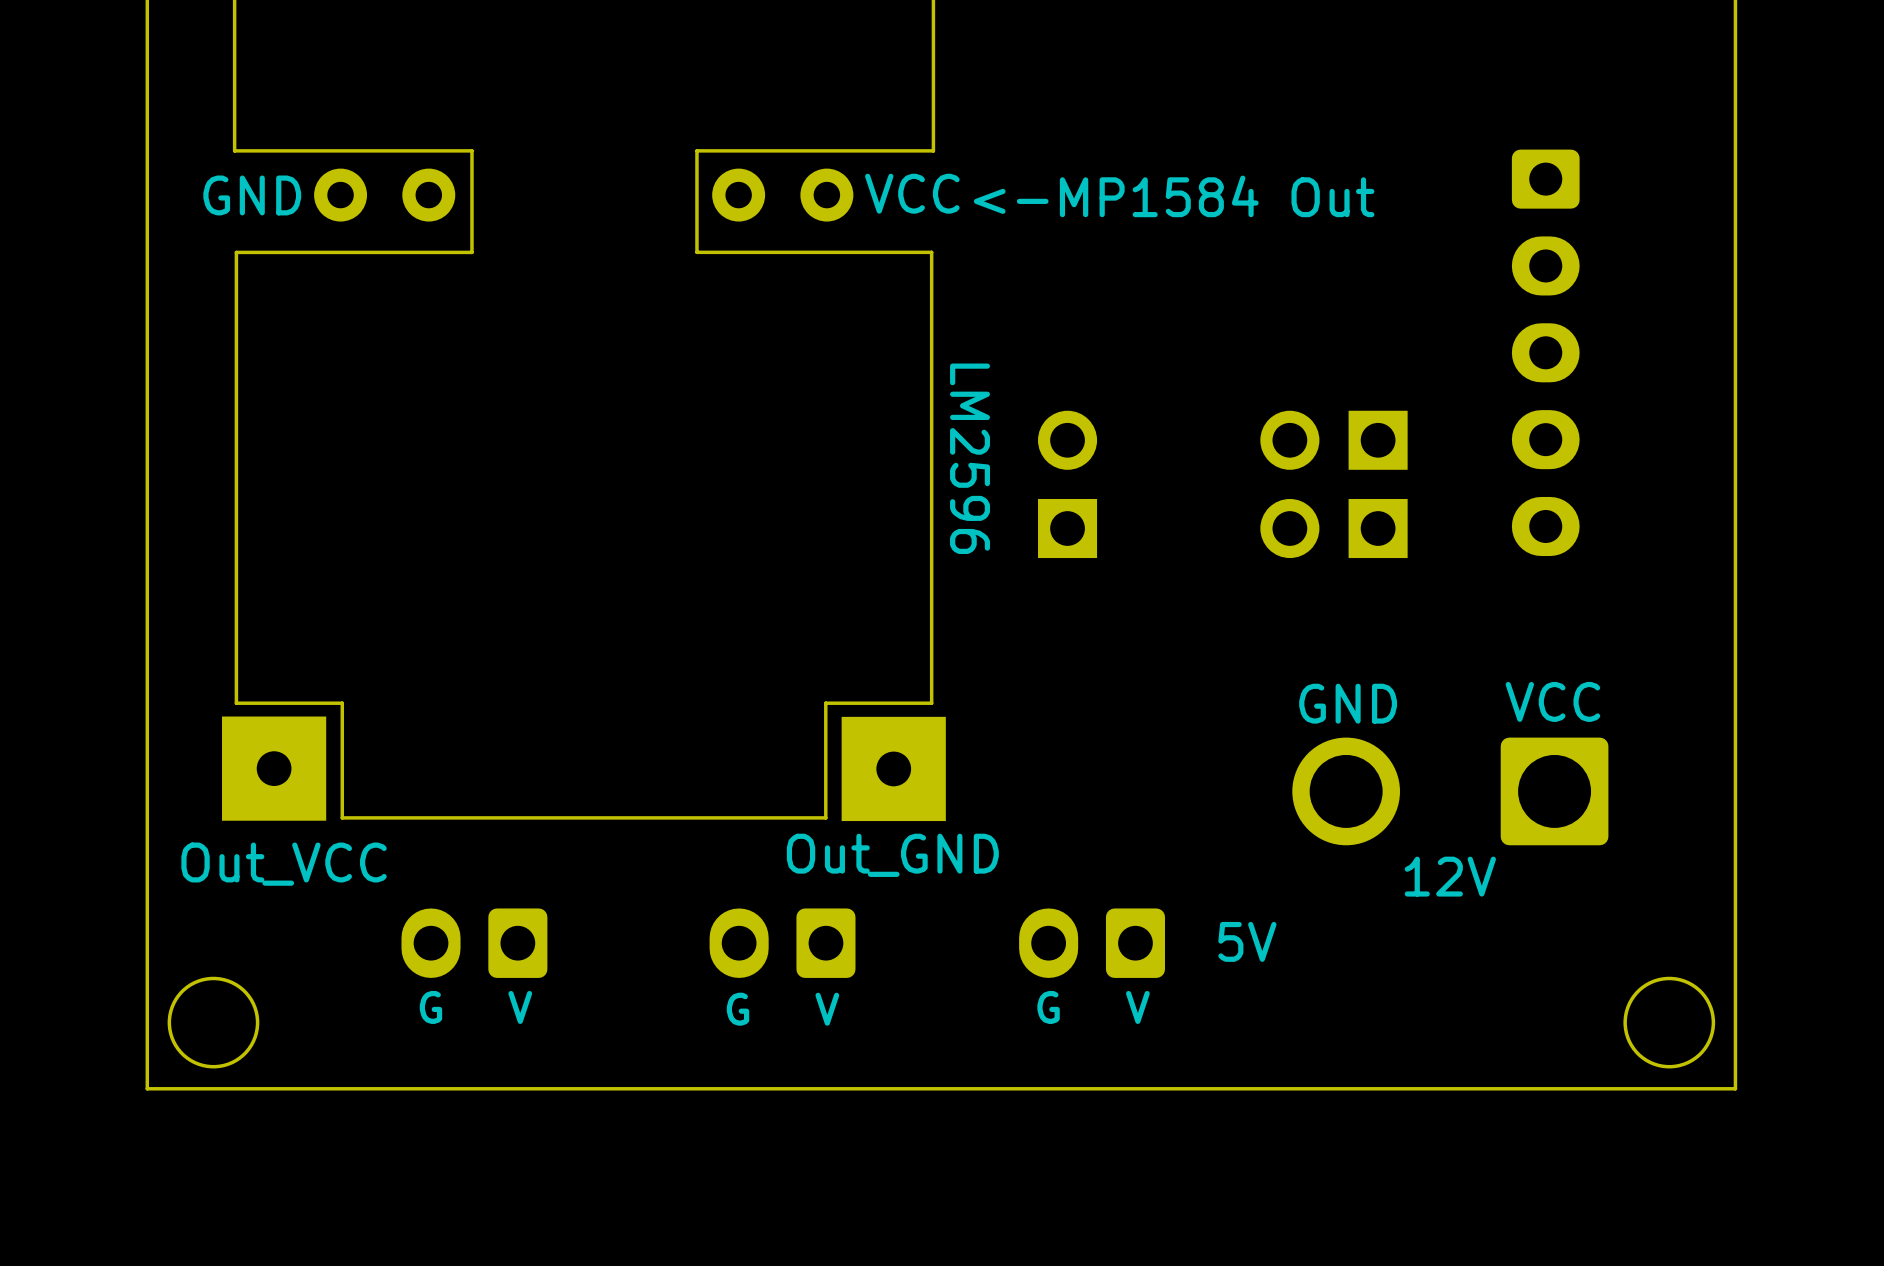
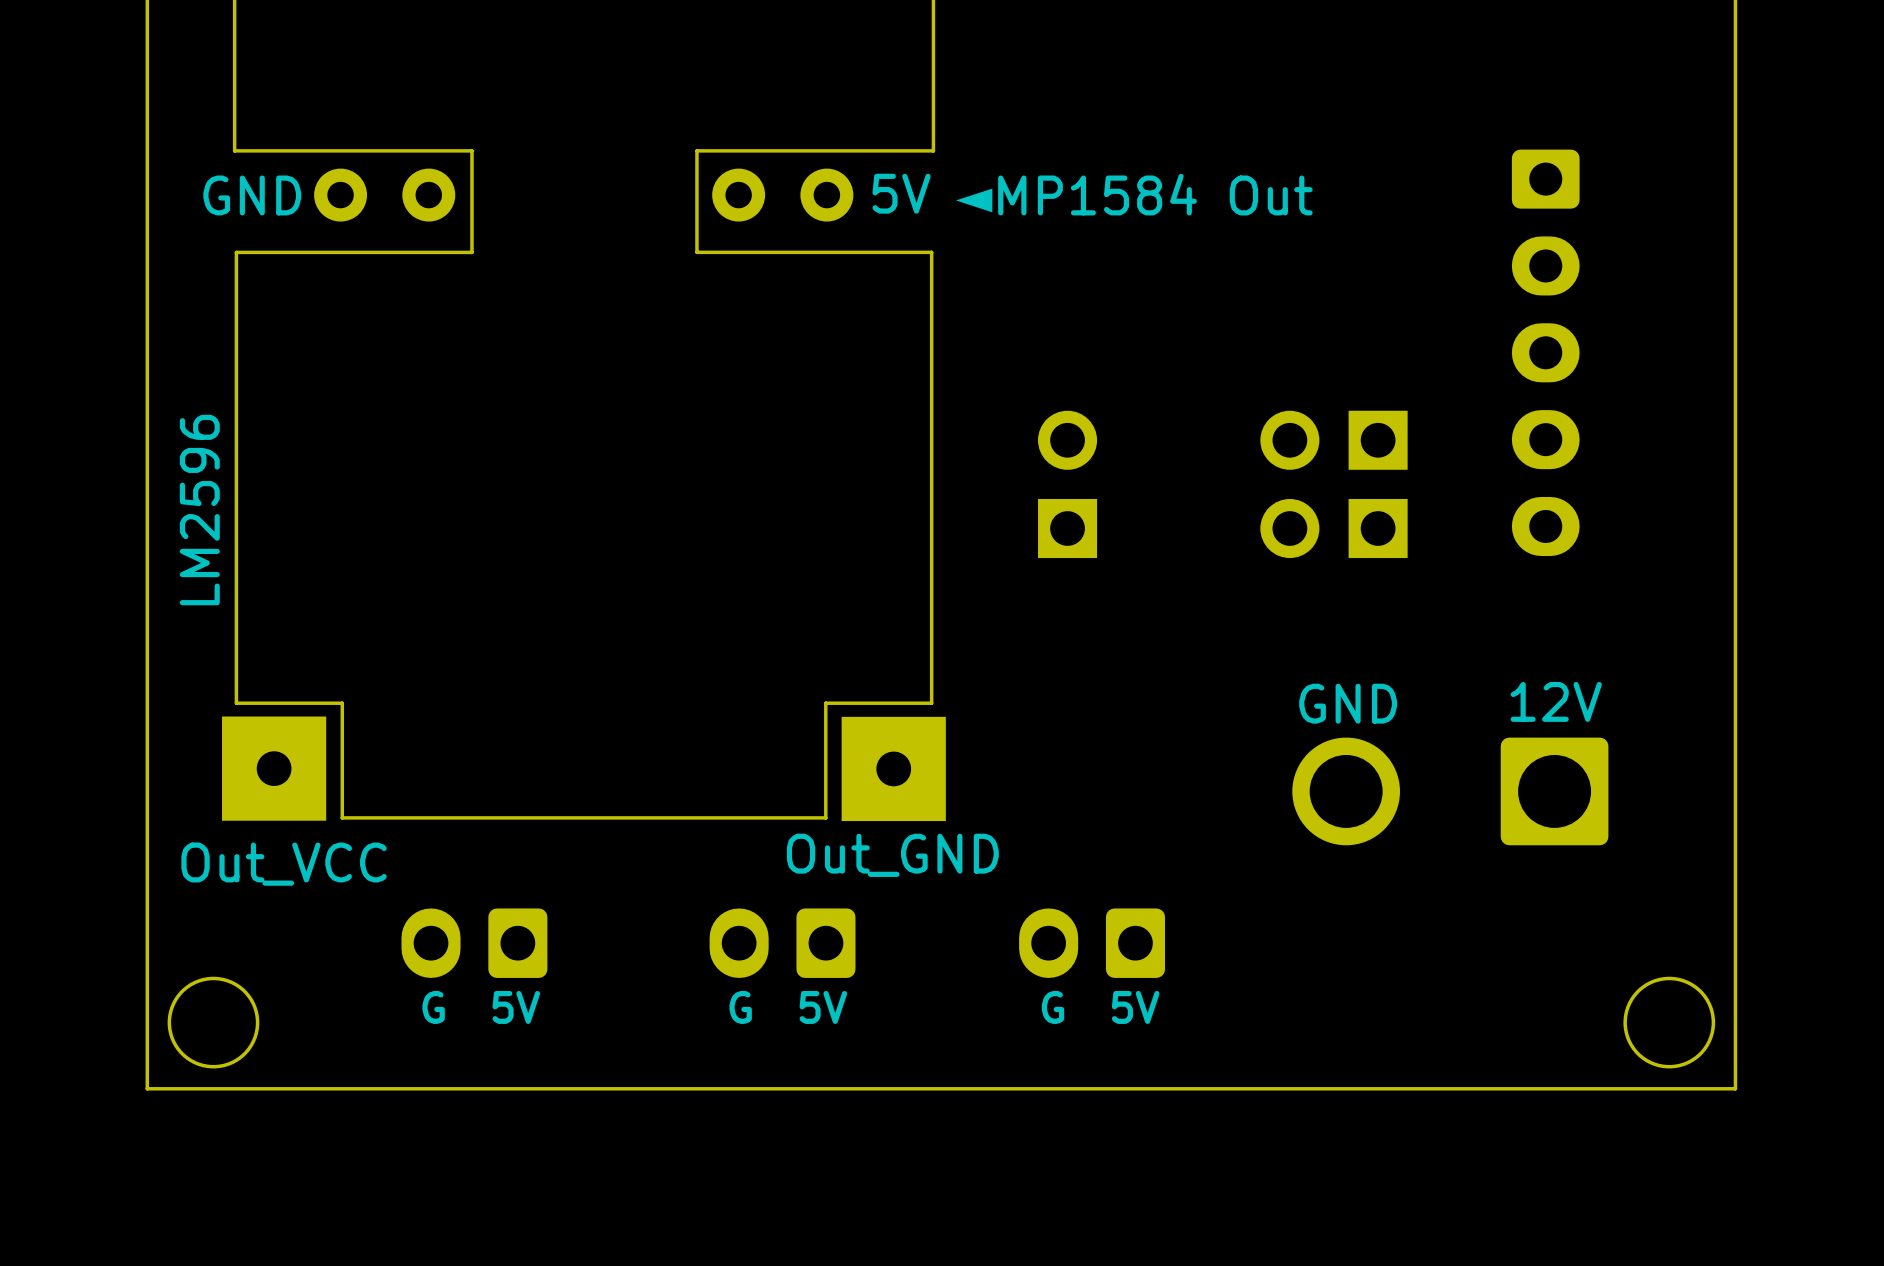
text: VCC (912, 193) -> 5V (901, 193)
text: <-MP1584 Out (1174, 196) -> ◄MP1584 Out (1133, 194)
text rotation: 0° (970, 458) -> 180° (199, 510)
text position: LM2596 (970, 458) -> LM2596 (199, 510)
text: VCC (1552, 701) -> 12V (1556, 701)
text: 12V (1450, 876) -> none
text: 5V (1247, 941) -> none
text: G V (475, 1007) -> G 5V (481, 1007)
text: G V (1093, 1007) -> G 5V (1100, 1007)
text: G V (782, 1009) -> G 5V (788, 1007)

